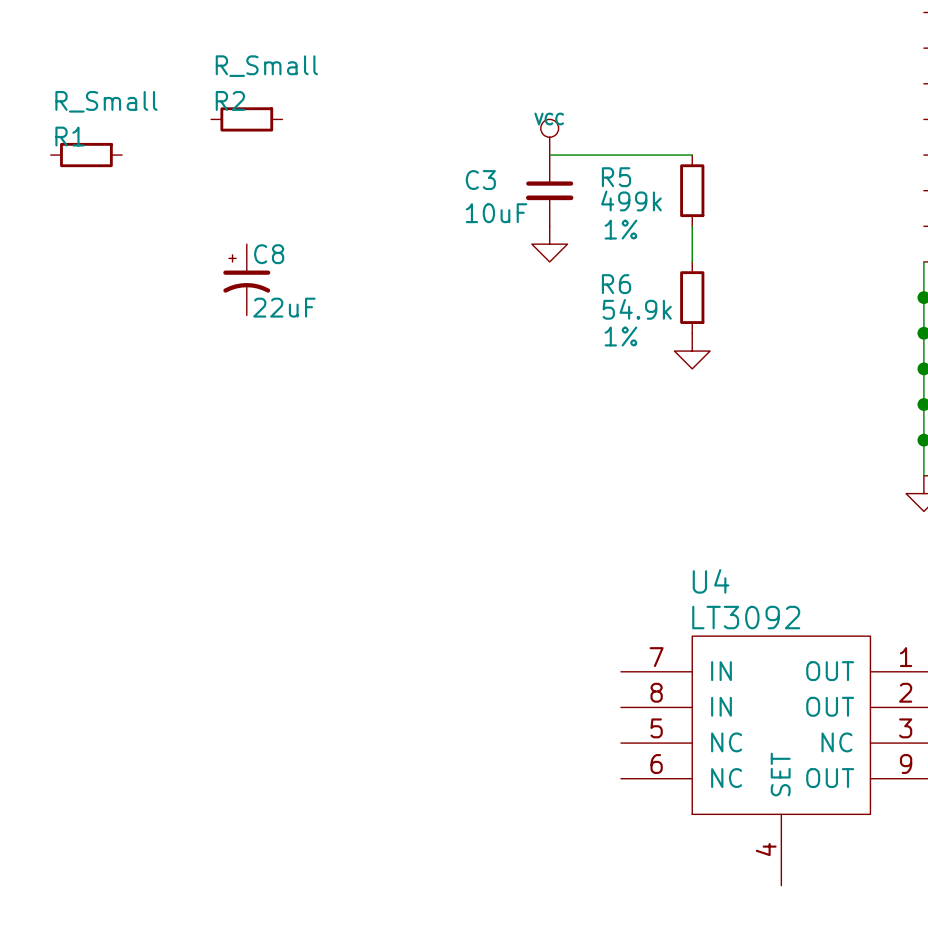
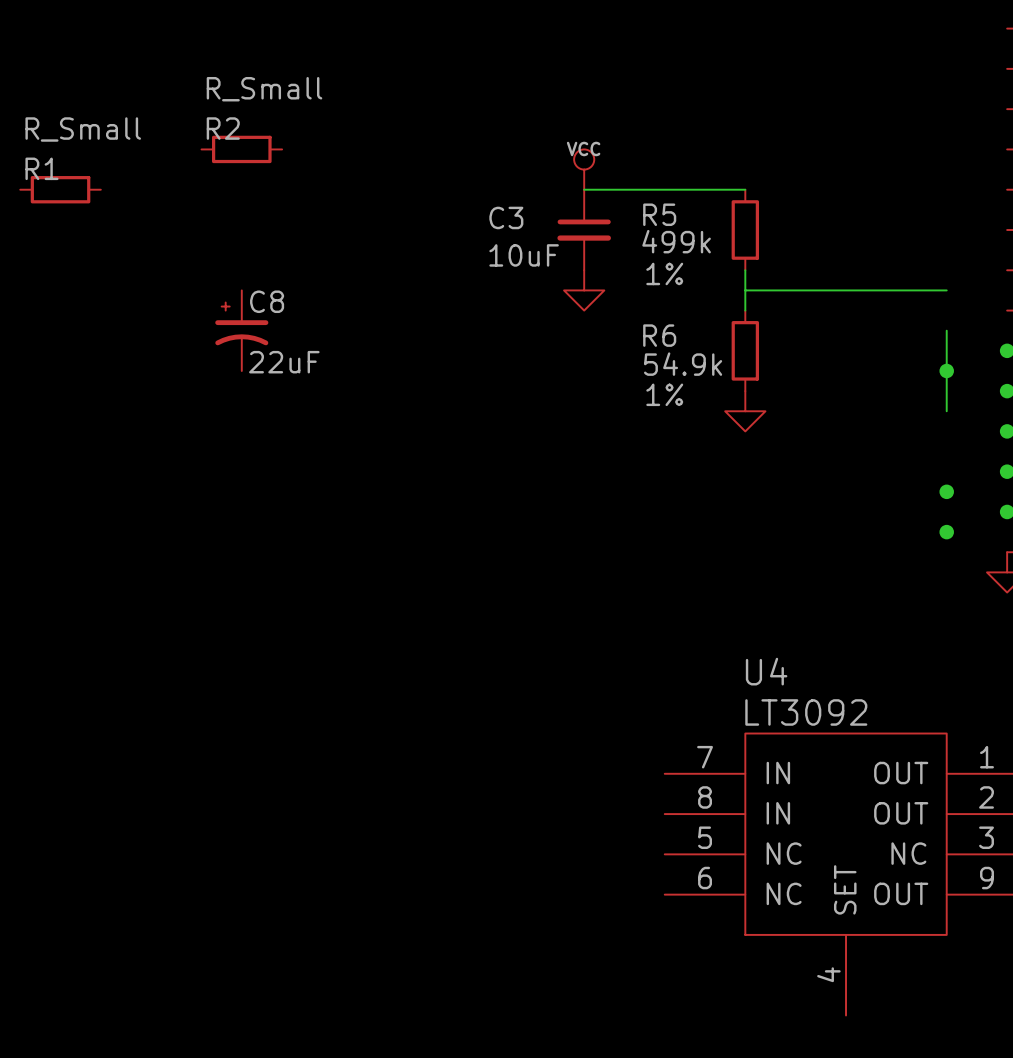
wire: none -> (745, 290) (946, 290)
wire: (923, 261) (923, 475) -> none
wire: none -> (946, 330) (946, 411)
junction: none -> (946, 370)
junction: none -> (946, 491)
junction: none -> (946, 532)

